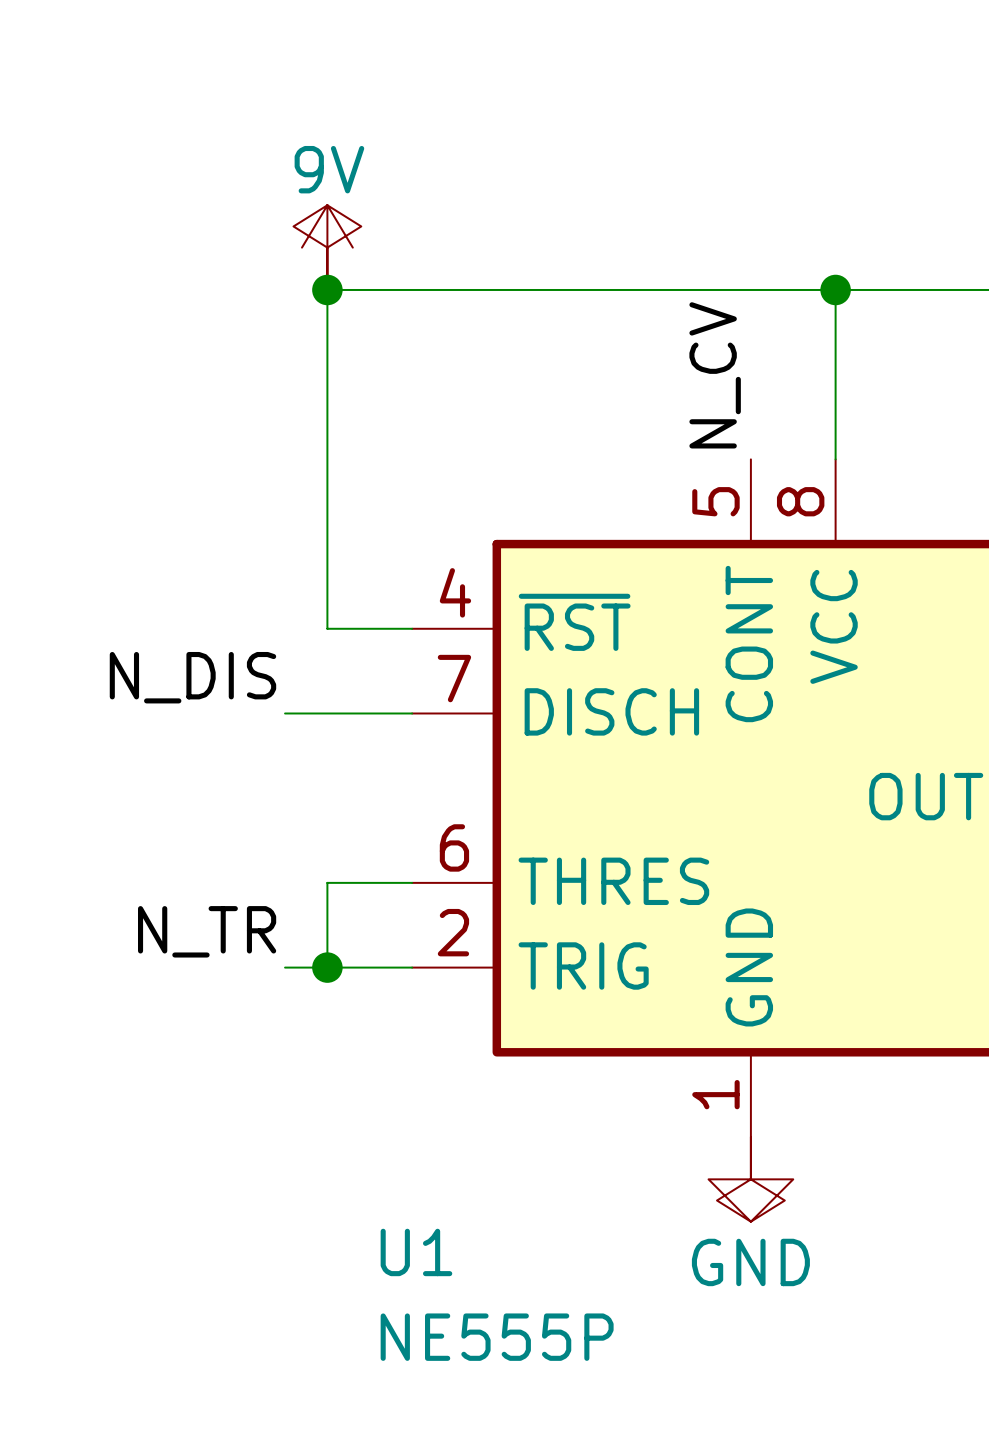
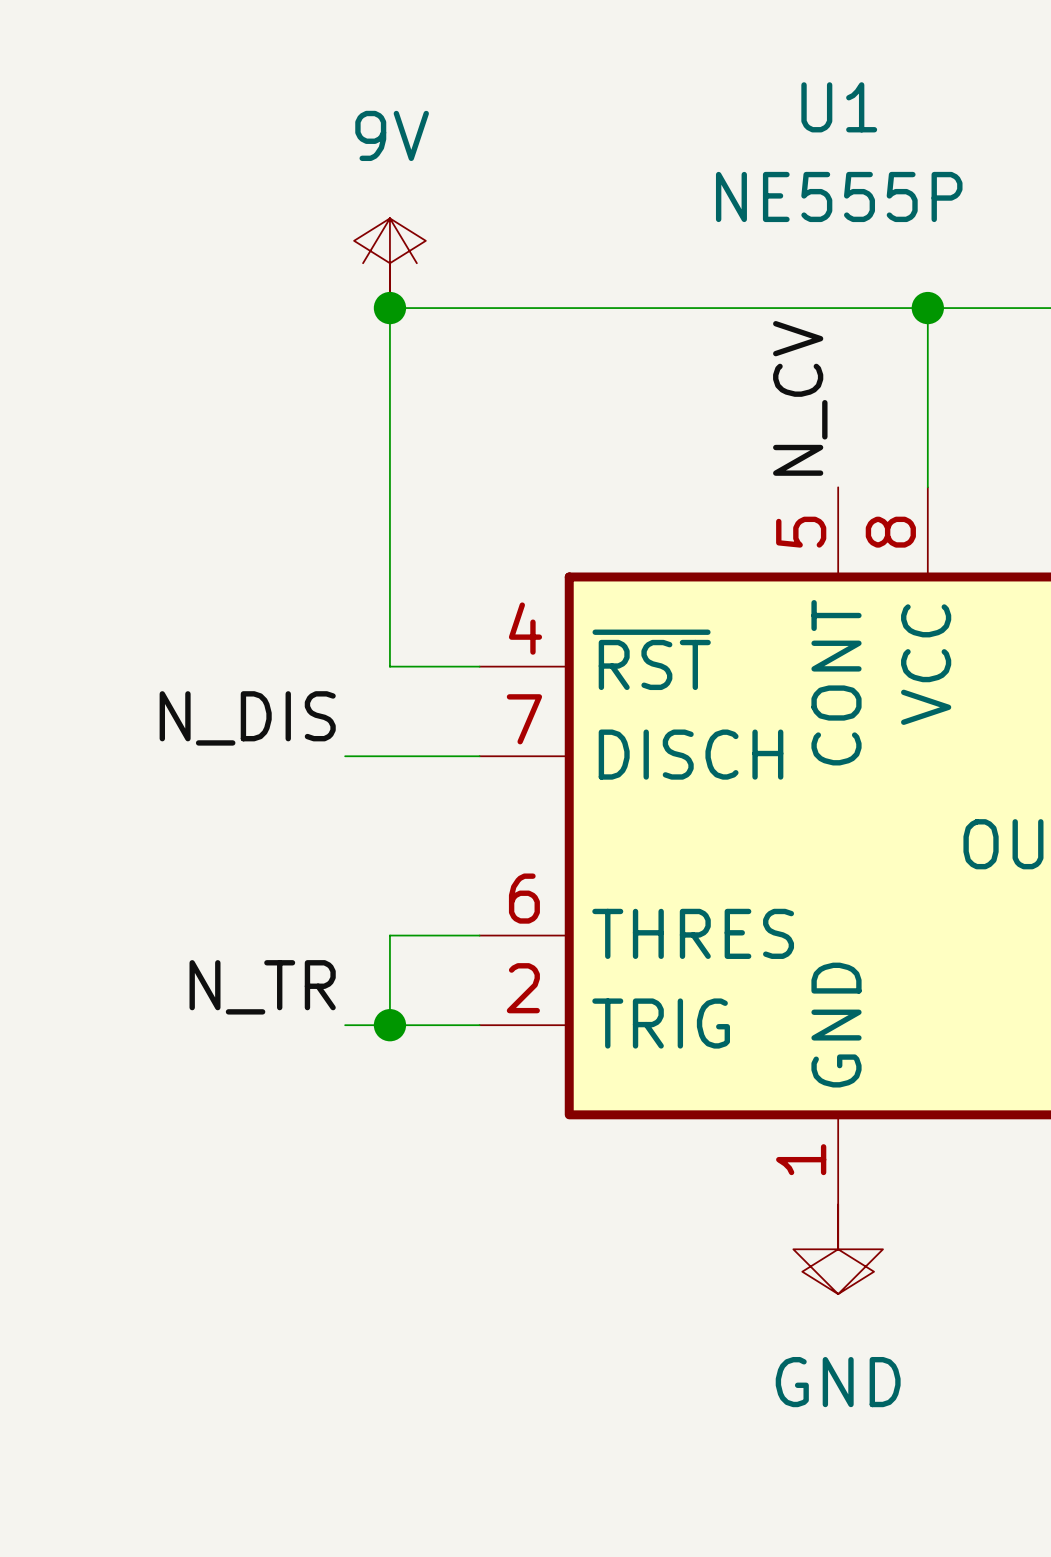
power symbol text position: 9V (329, 169) -> 9V (392, 135)
U1 name position: U1 (416, 1252) -> U1 (839, 107)
power symbol text position: GND (750, 1262) -> GND (838, 1382)
U1 value position: NE555P (497, 1337) -> NE555P (839, 196)

